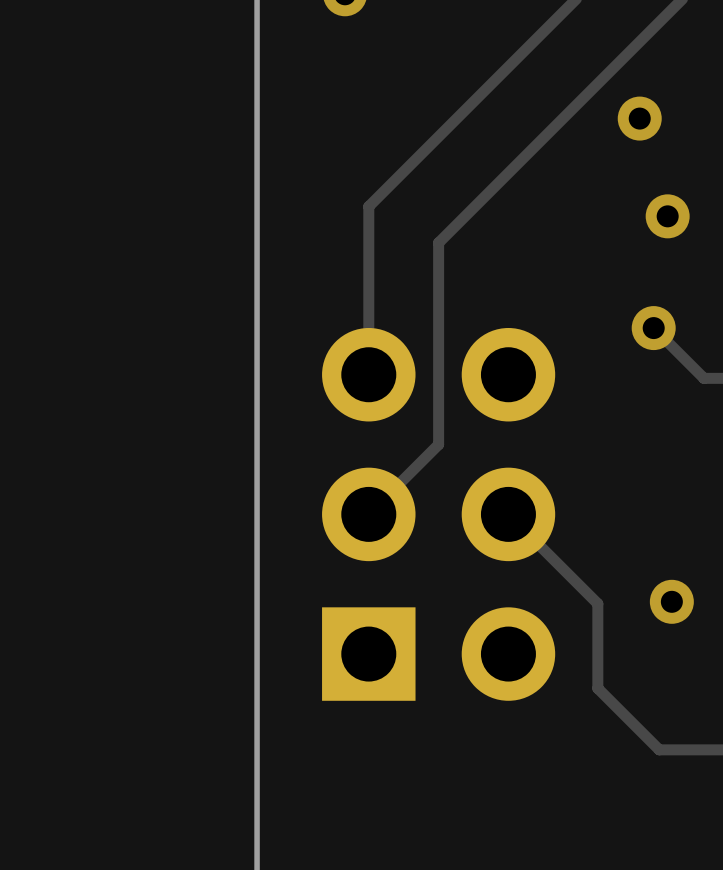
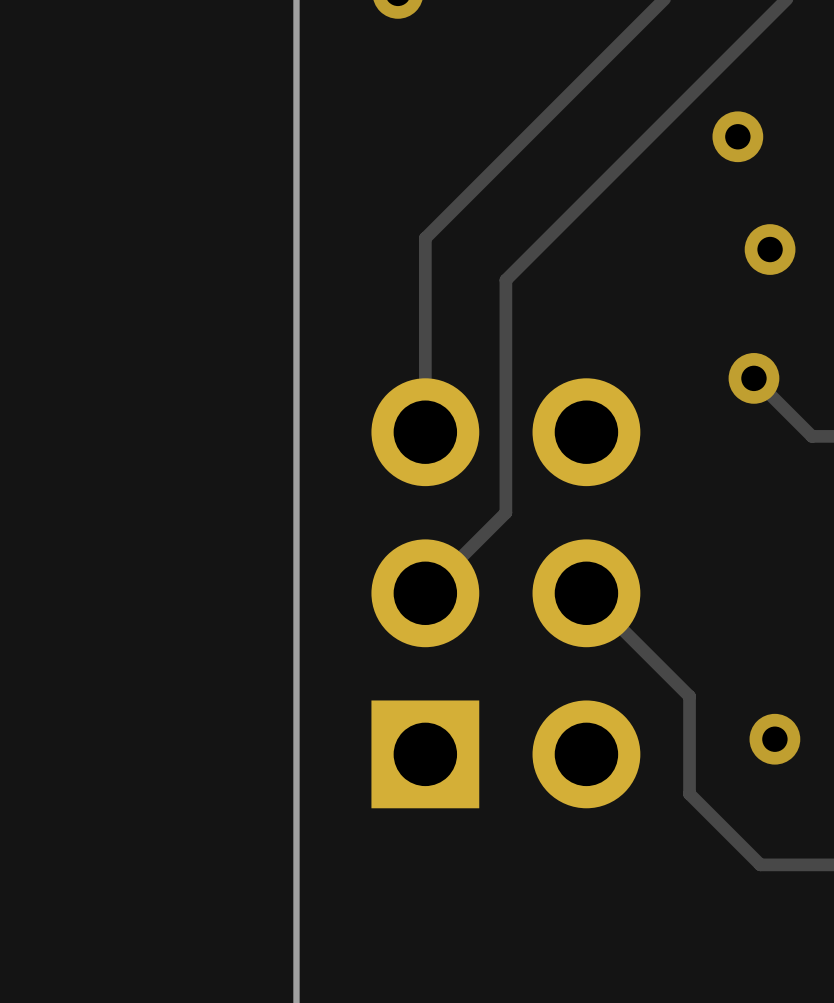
via position: (671, 601) -> (774, 739)

